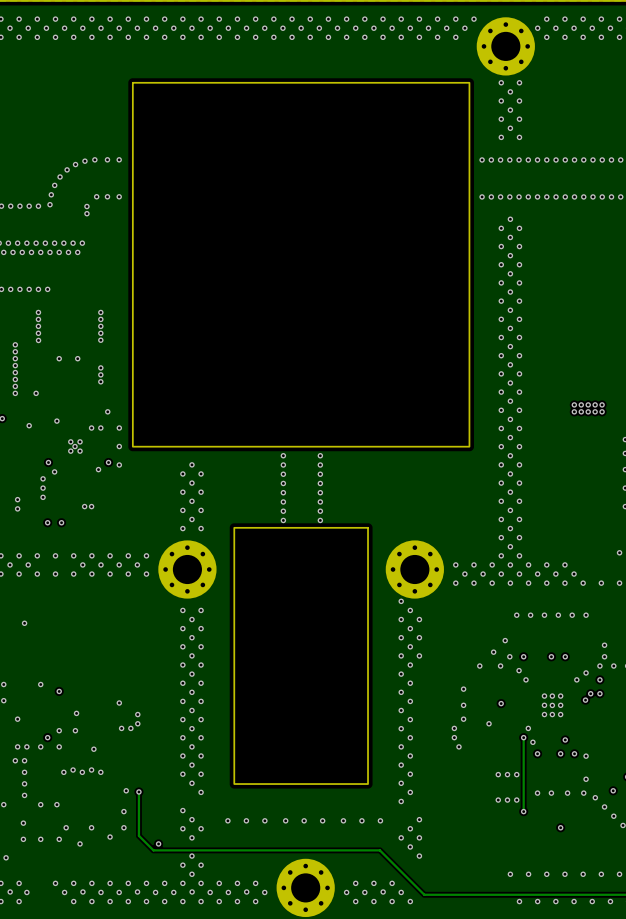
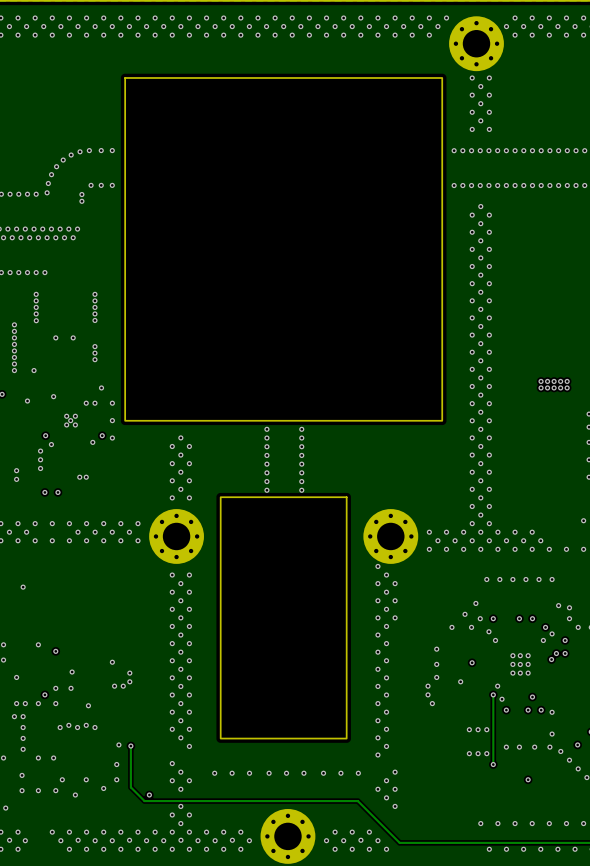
via: none -> (558, 605)
via: none -> (545, 627)
via: (599, 666) -> none

